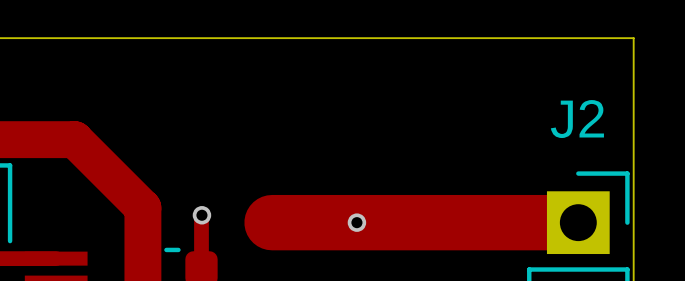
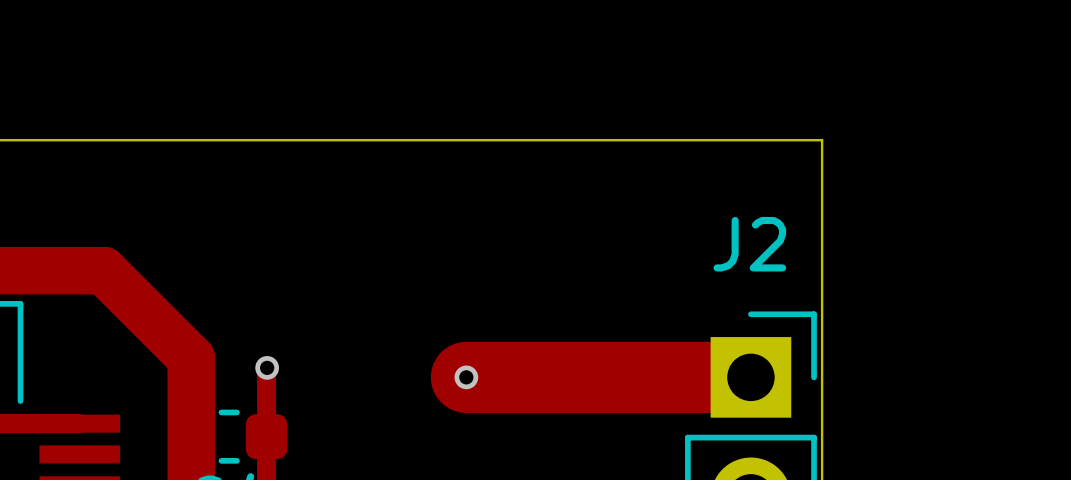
track: (272, 222) (356, 222) -> none

